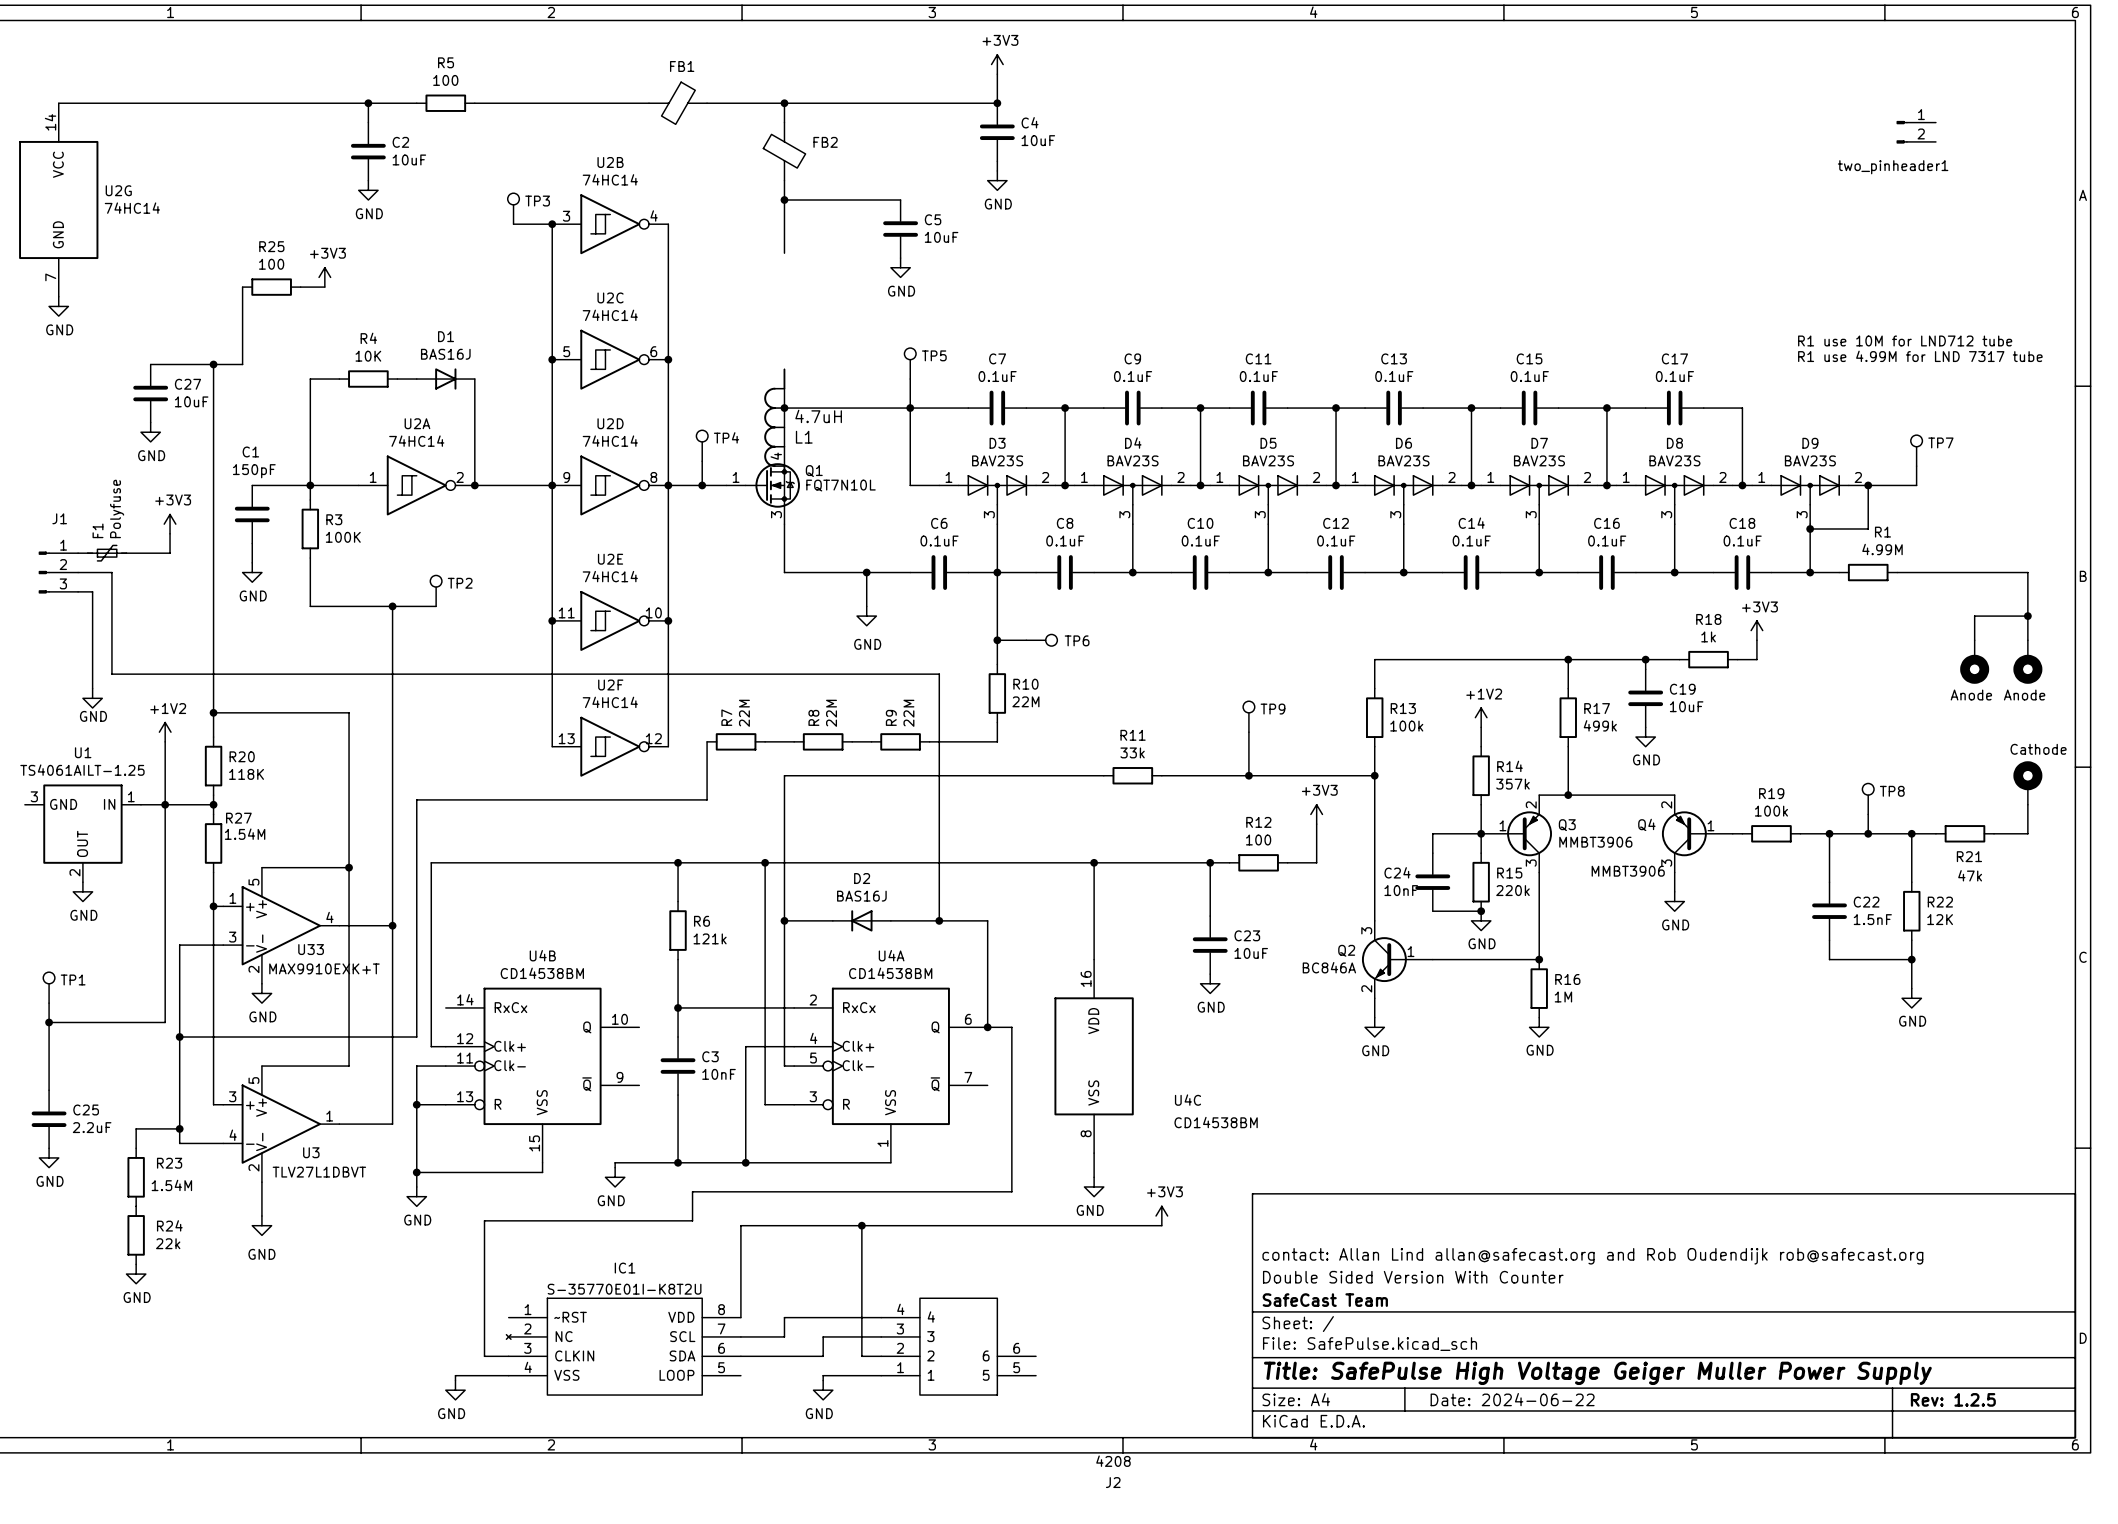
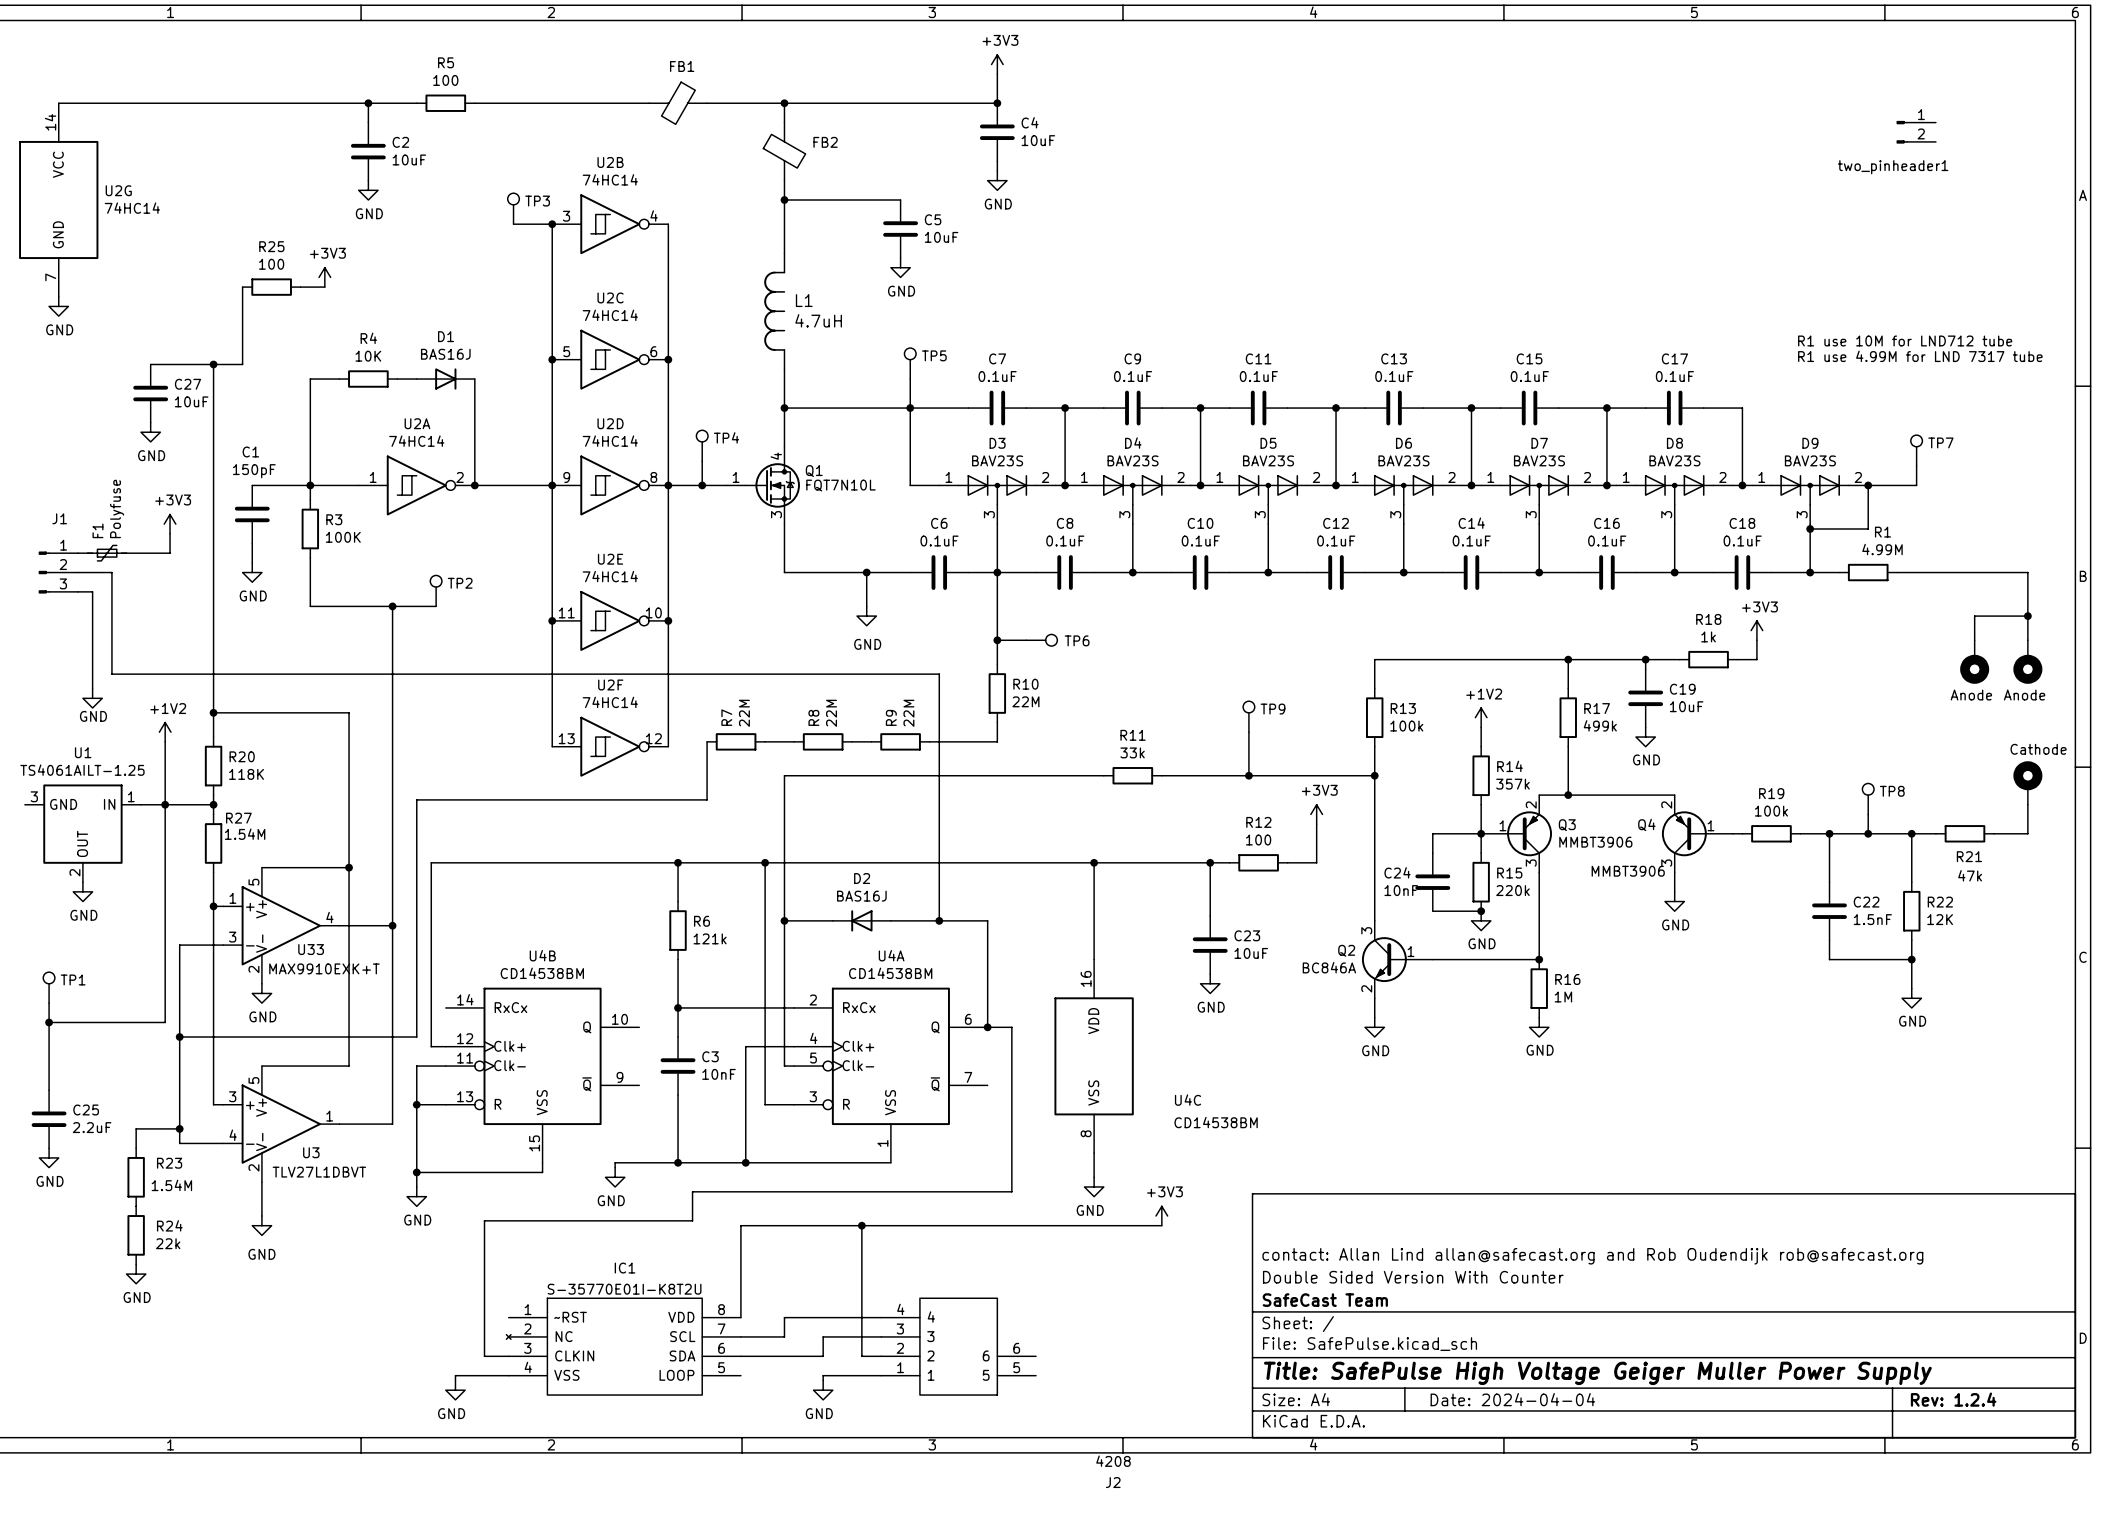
L1 value position: 4.7uH (818, 416) -> 4.7uH (818, 320)
L1 position: (774, 427) -> (774, 311)
L1 name position: L1 (804, 437) -> L1 (804, 300)
title block: Date: 2024-06-22 (1512, 1399) -> Date: 2024-04-04 (1512, 1399)
title block: Rev: 1.2.5 (1953, 1399) -> Rev: 1.2.4 (1953, 1399)

